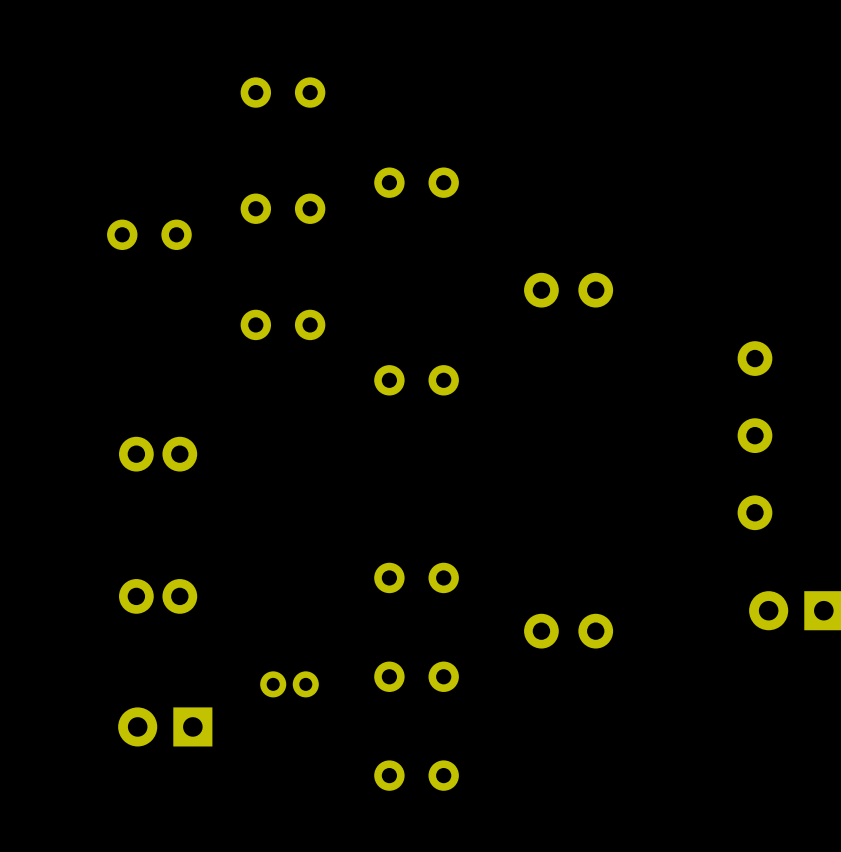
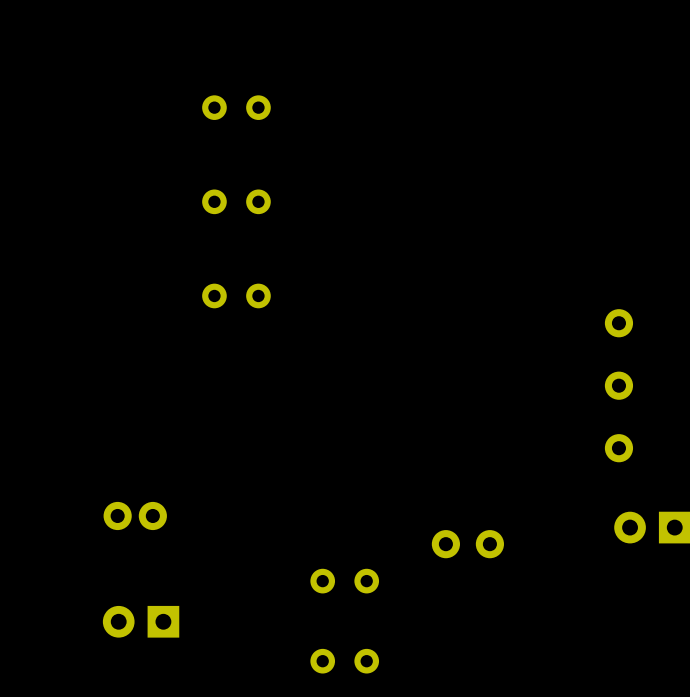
part: (416, 182) -> none
part: (149, 234) -> none
part: (568, 290) -> none
part: (416, 380) -> none
part: (158, 454) -> none
part: (416, 577) -> none
part: (289, 684) -> none

